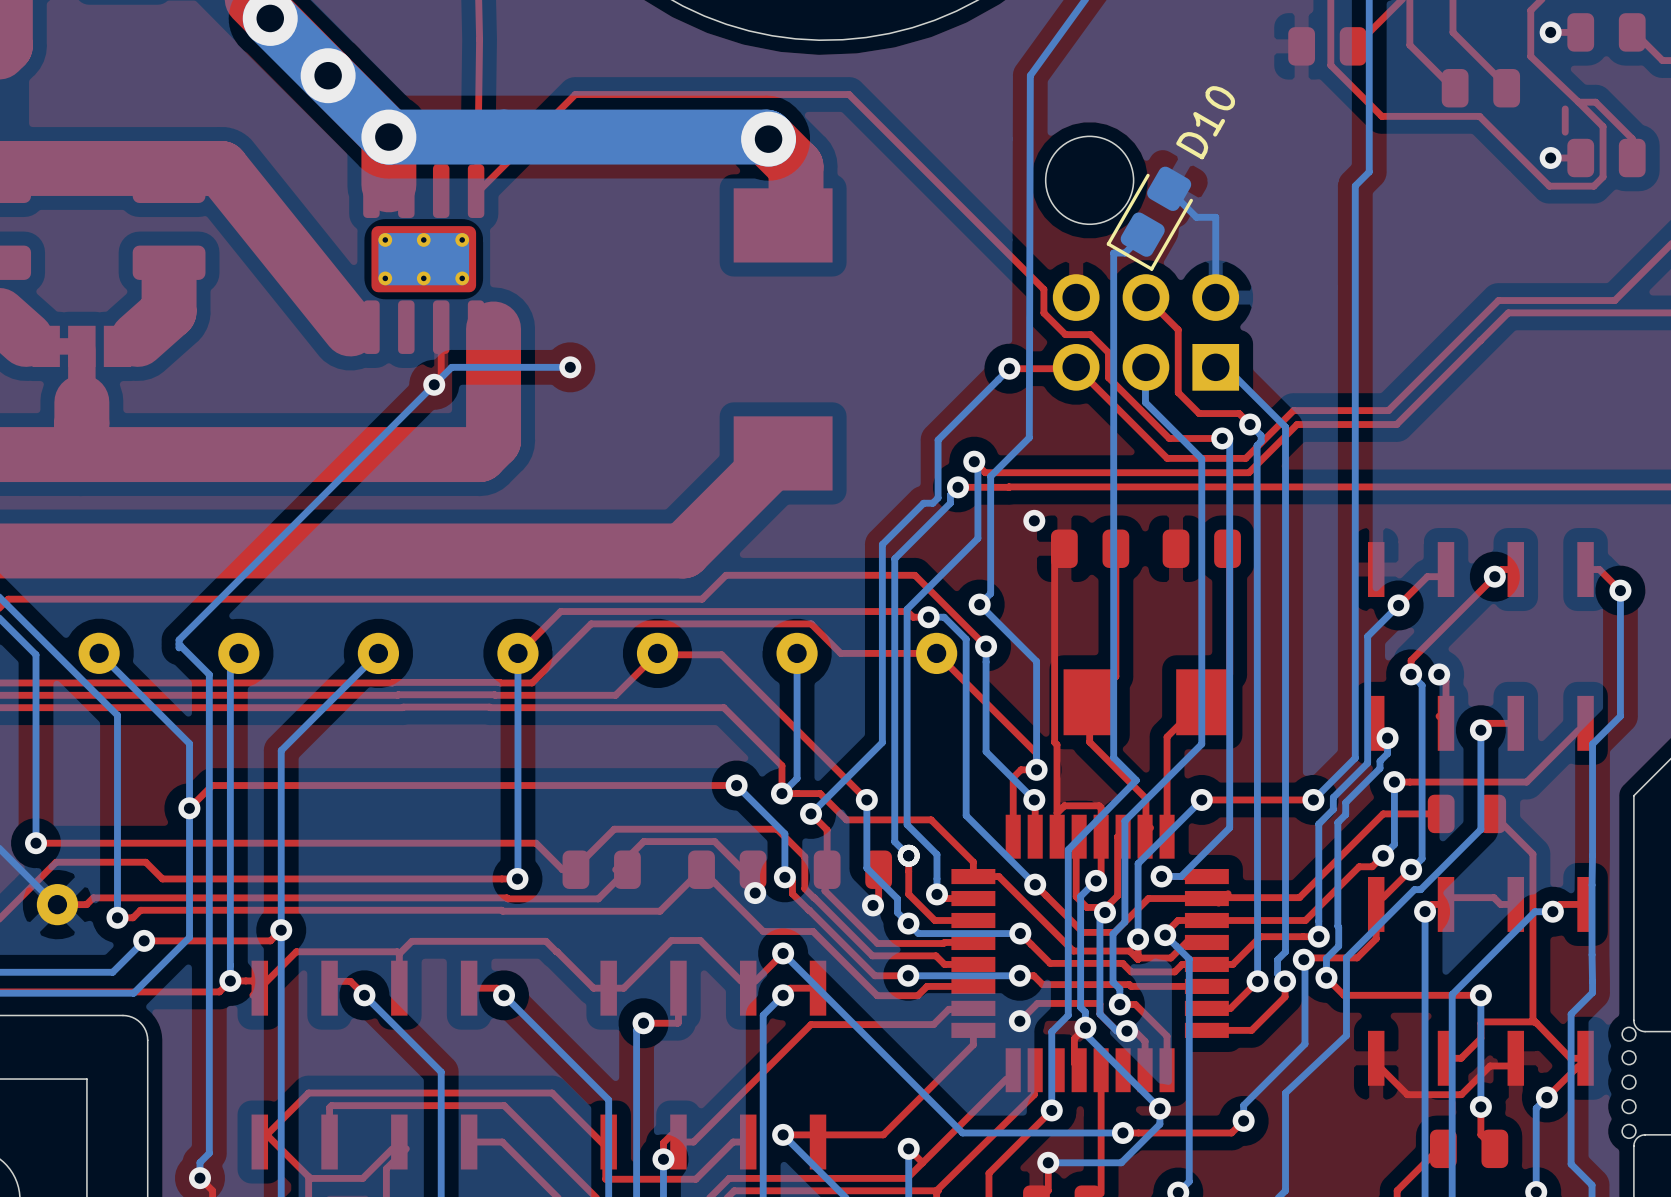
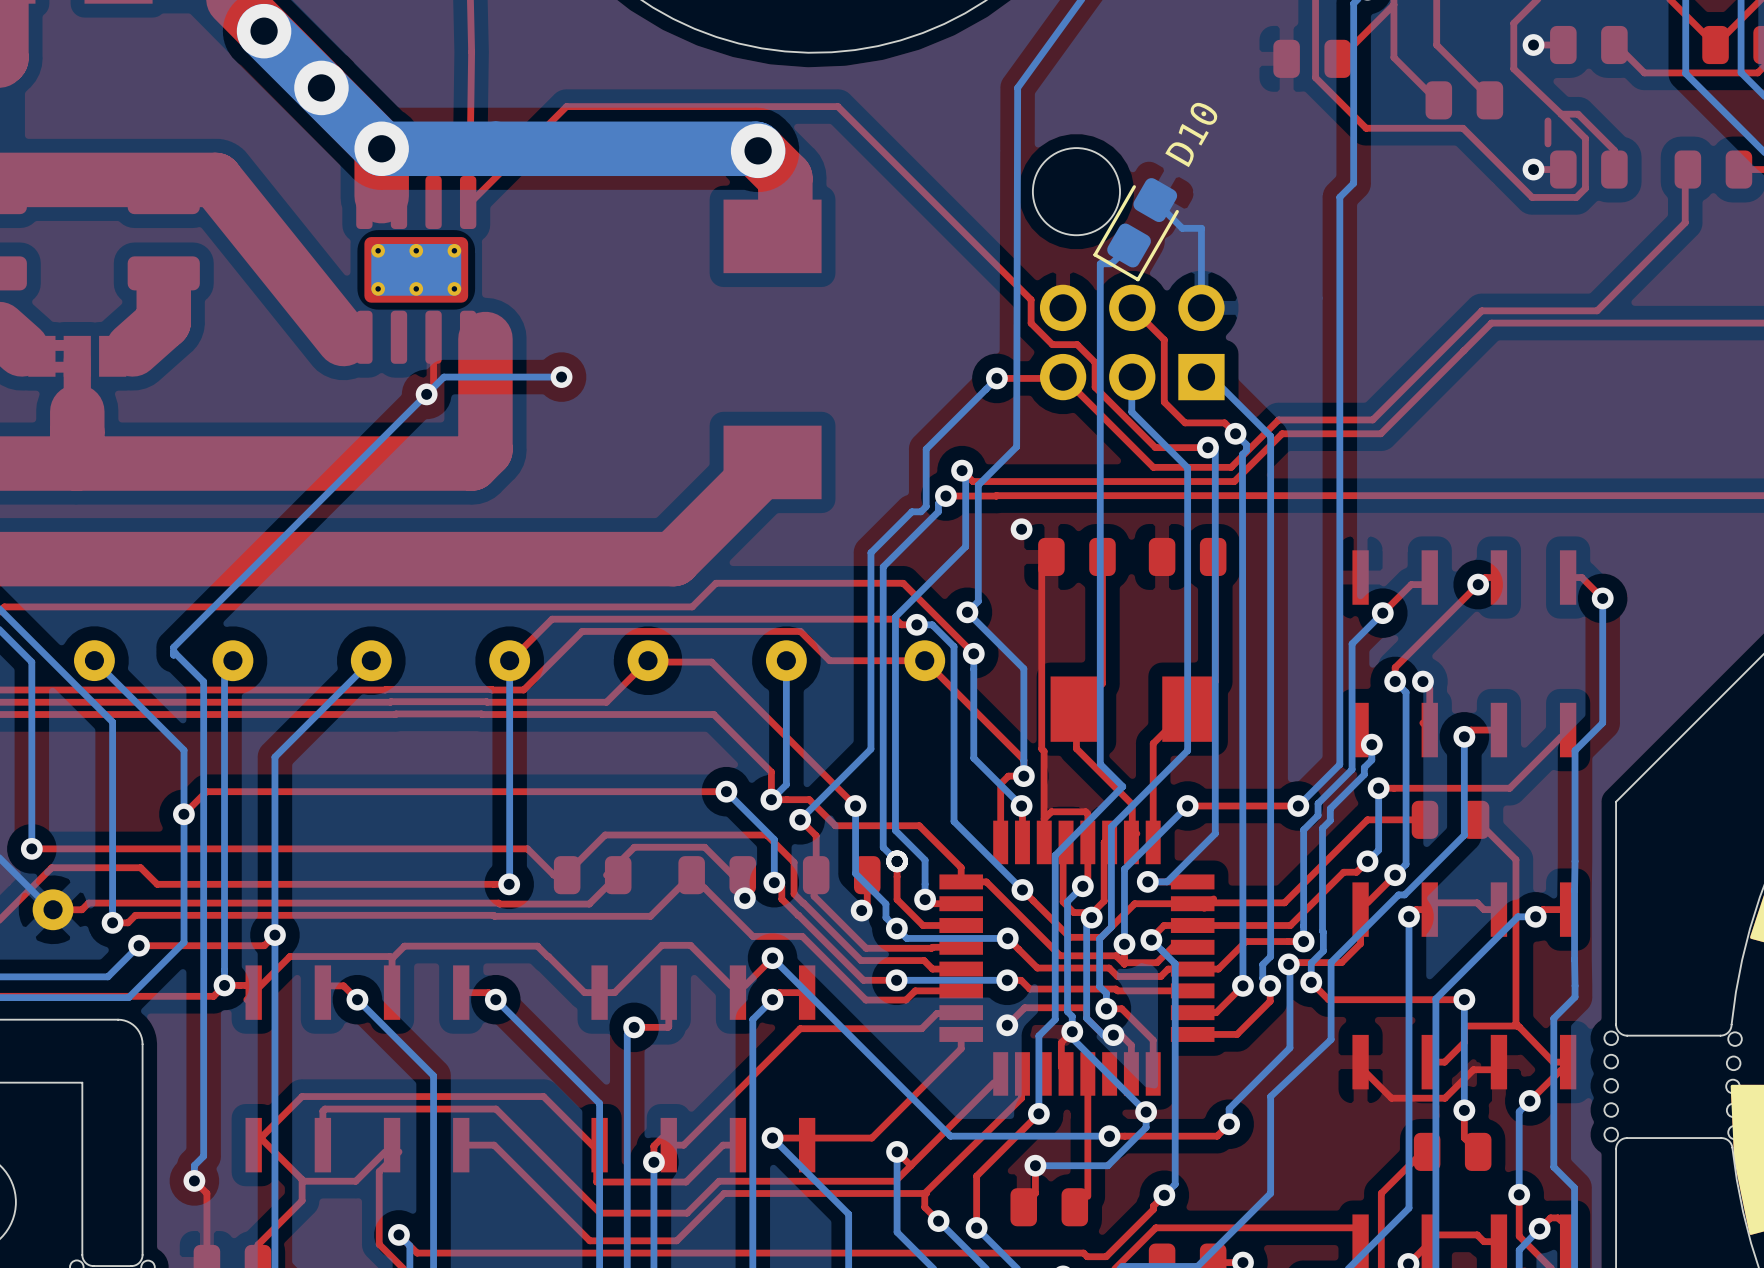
part footprint: [32, 325, 132, 368] -> [28, 335, 127, 377]

